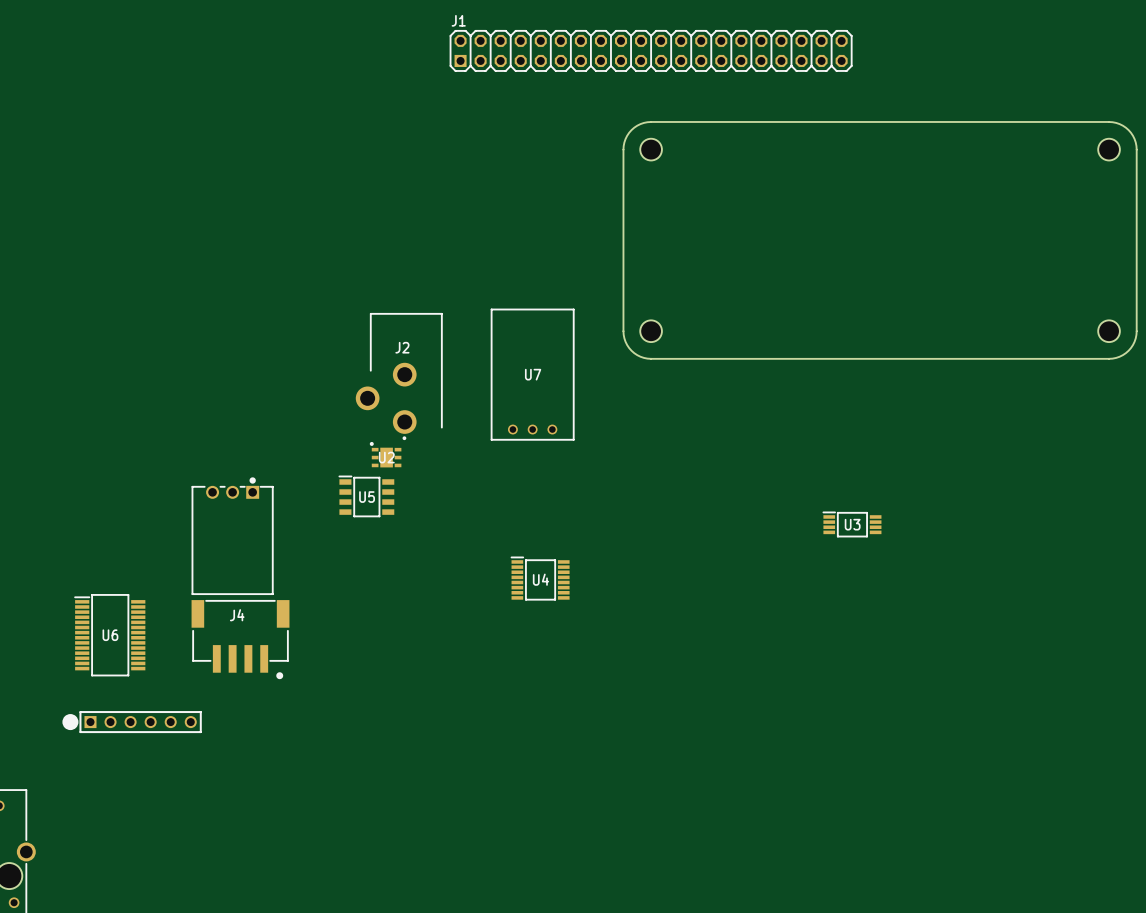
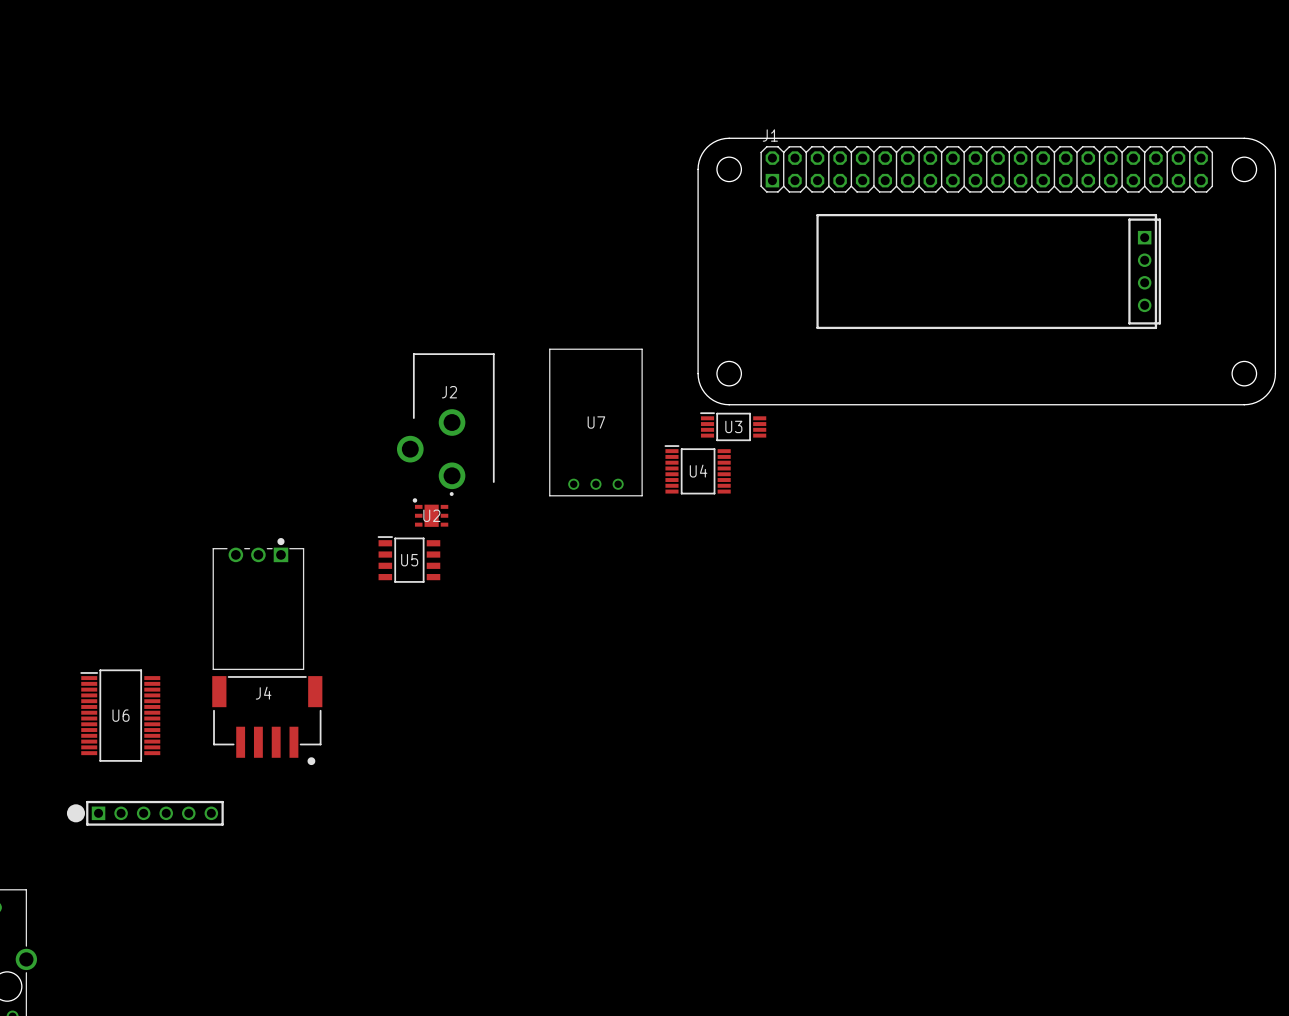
J1 position: (651, 50) -> (986, 169)
drawing: none -> [816, 213, 1158, 330]
part: none -> (1144, 271)
U3 position: (852, 524) -> (733, 426)
U4 position: (540, 578) -> (697, 469)

